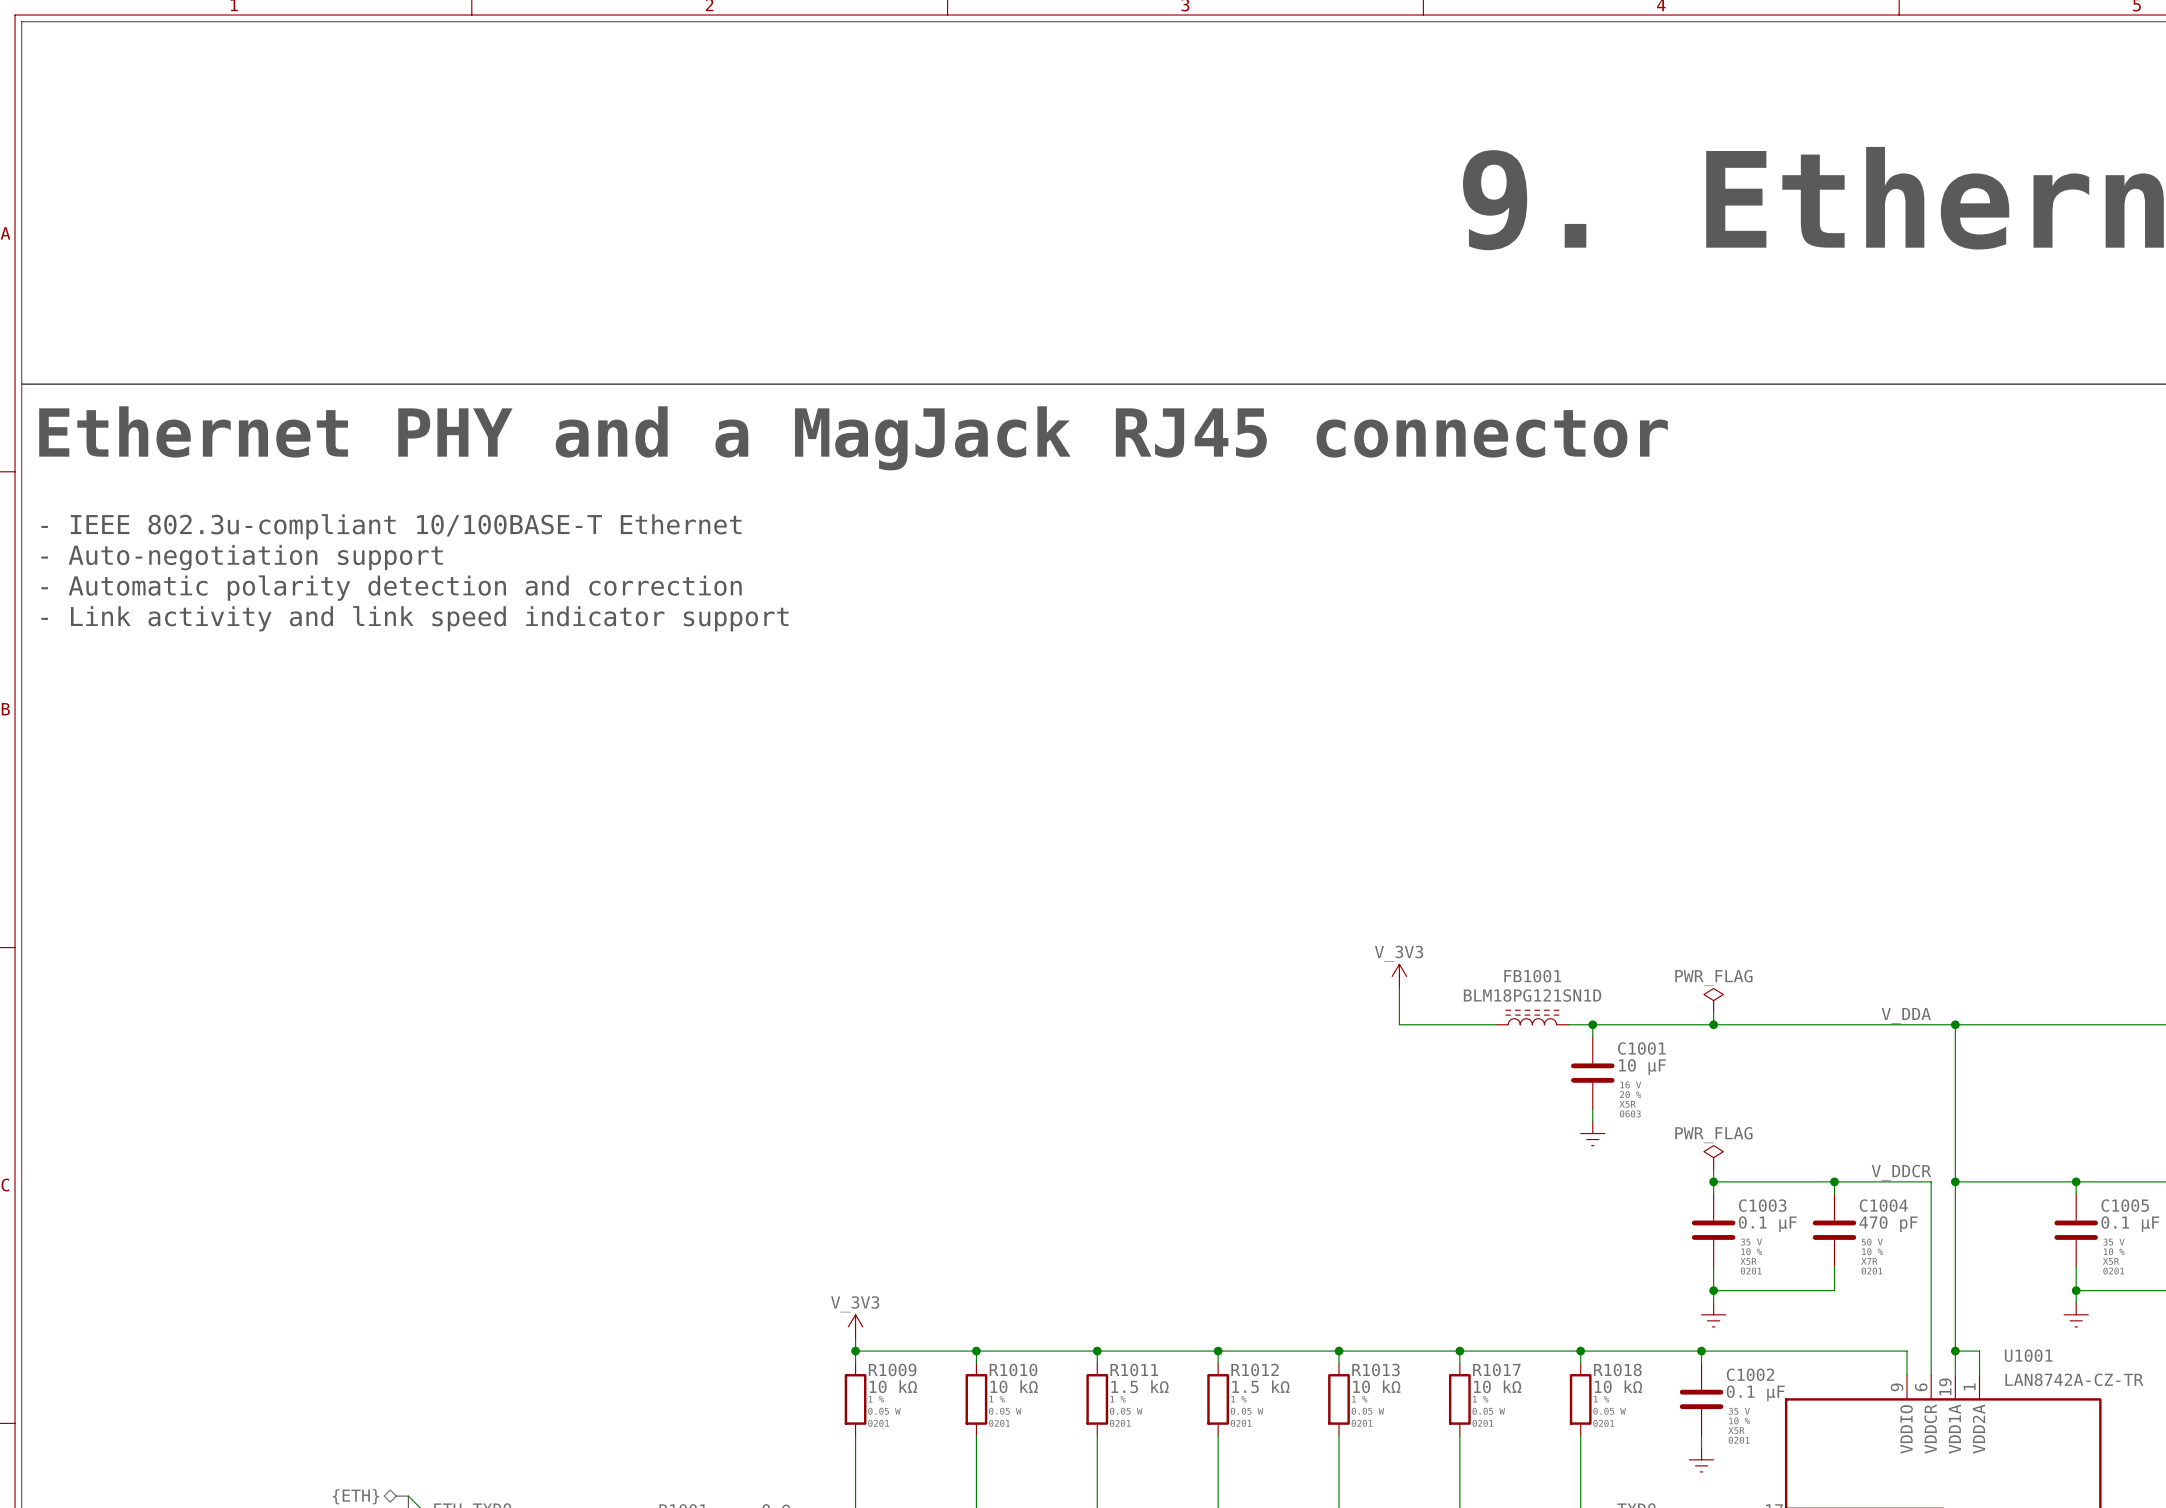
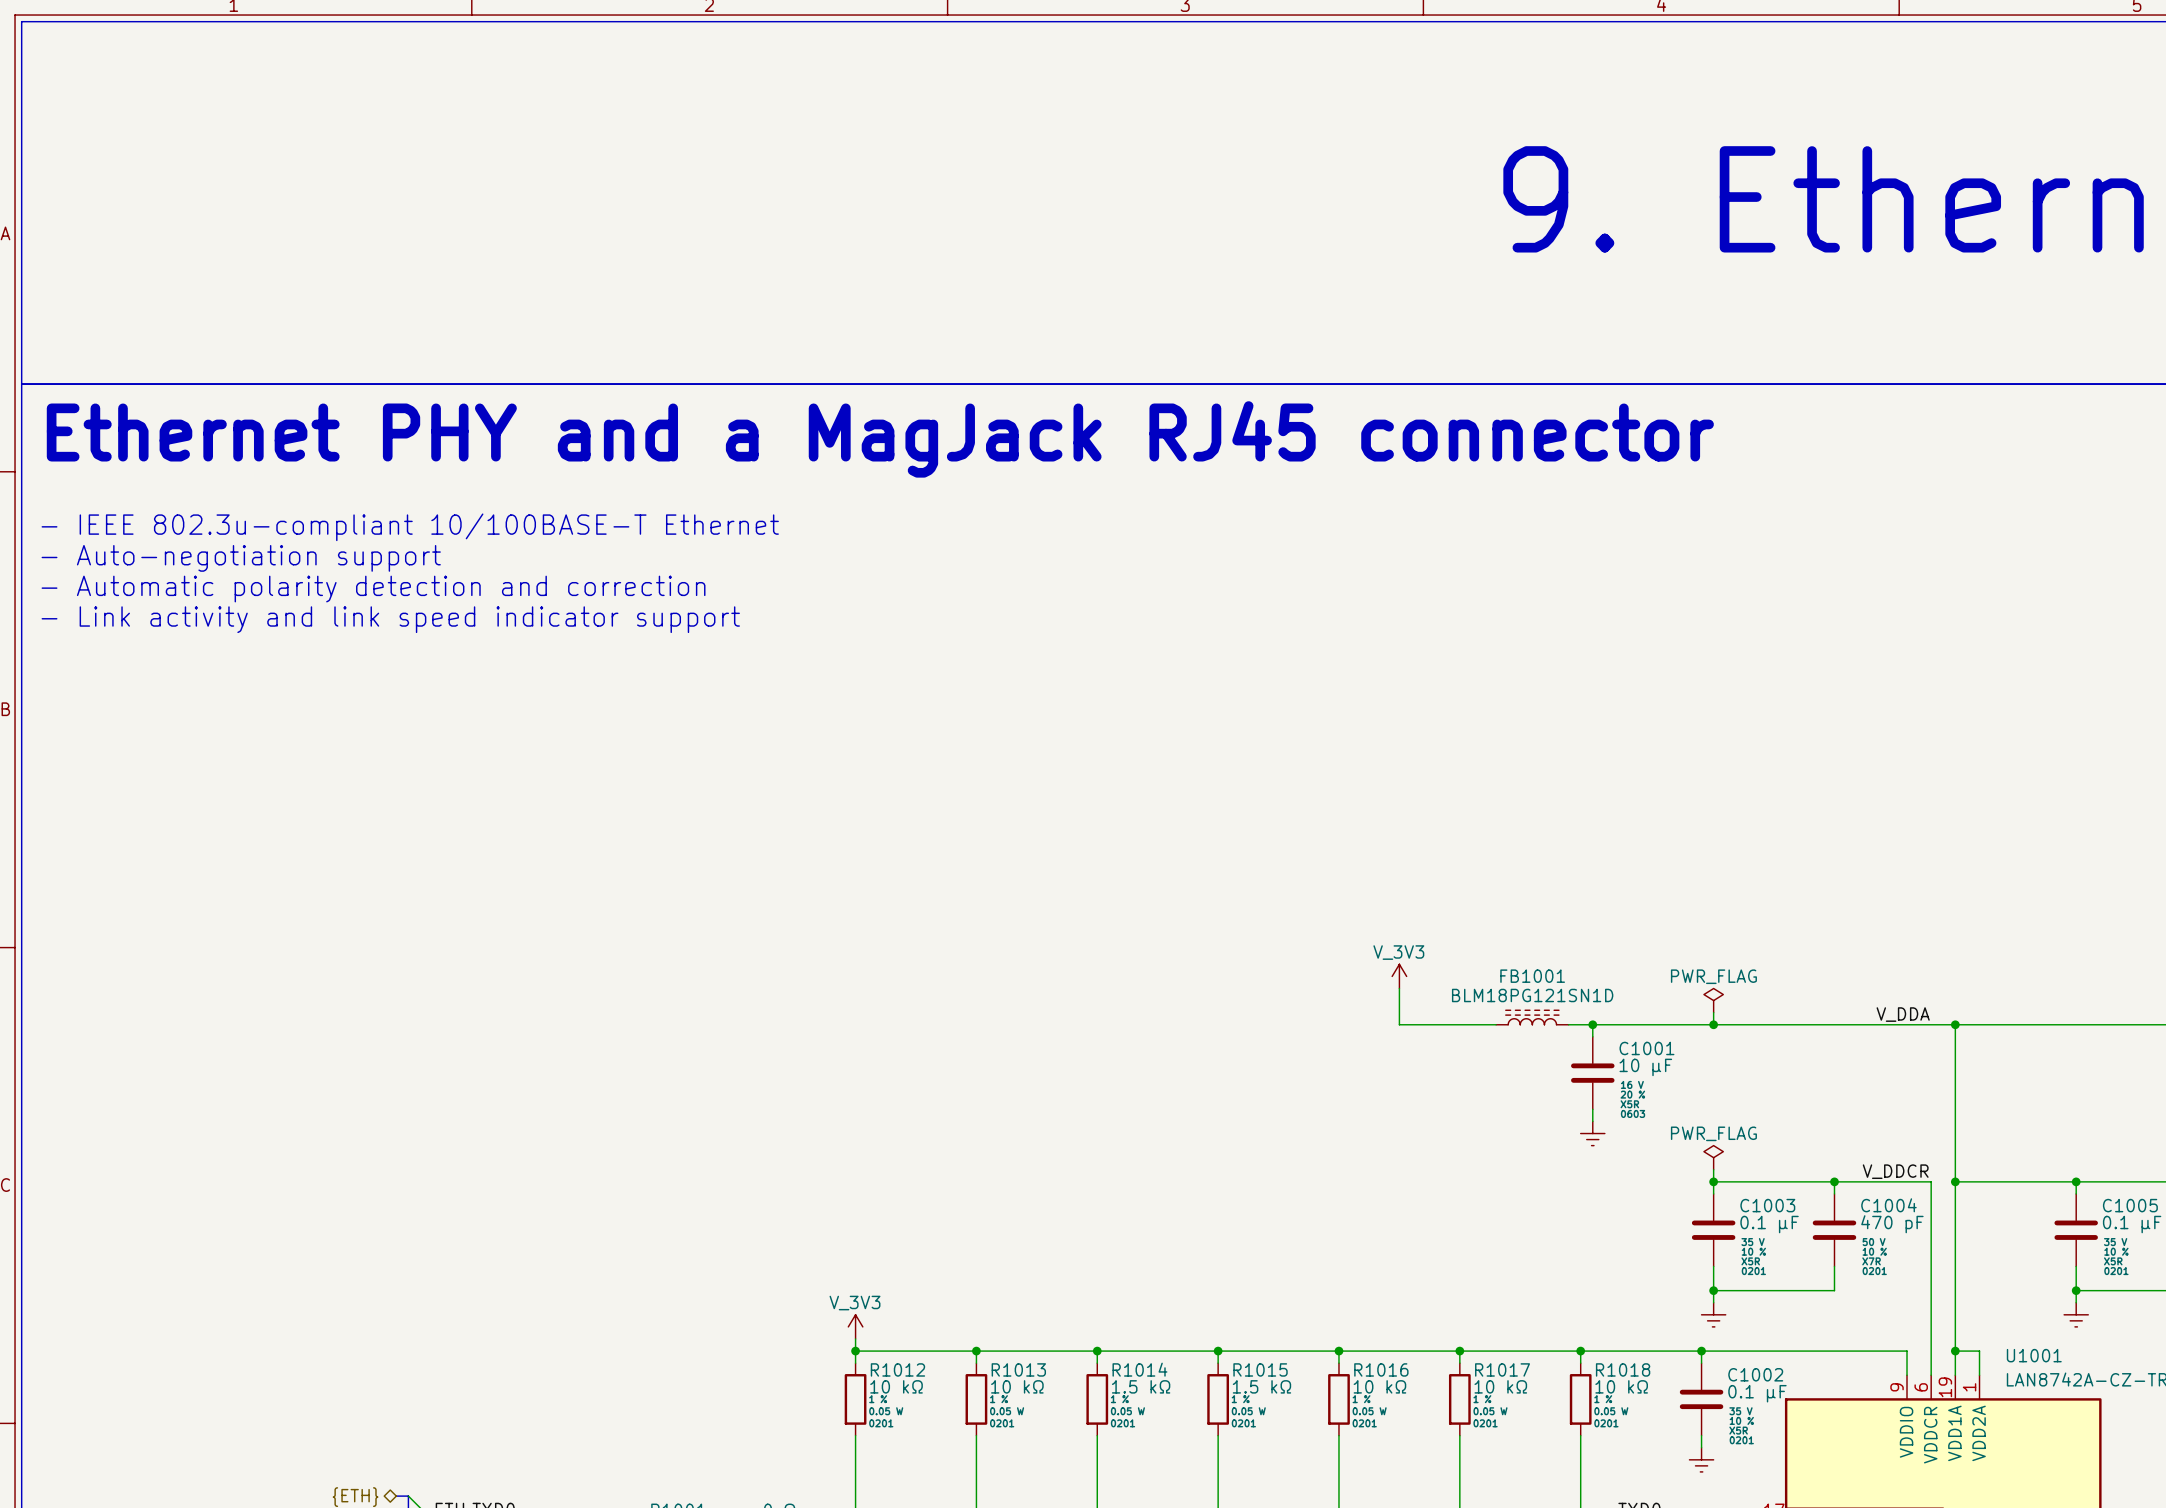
R1009 name: R1009 (892, 1369) -> R1012 (897, 1369)
R1010 name: R1010 (1013, 1369) -> R1013 (1018, 1369)
R1011 name: R1011 (1134, 1369) -> R1014 (1139, 1369)
R1012 name: R1012 (1255, 1369) -> R1015 (1260, 1369)
R1013 name: R1013 (1375, 1369) -> R1016 (1381, 1369)

